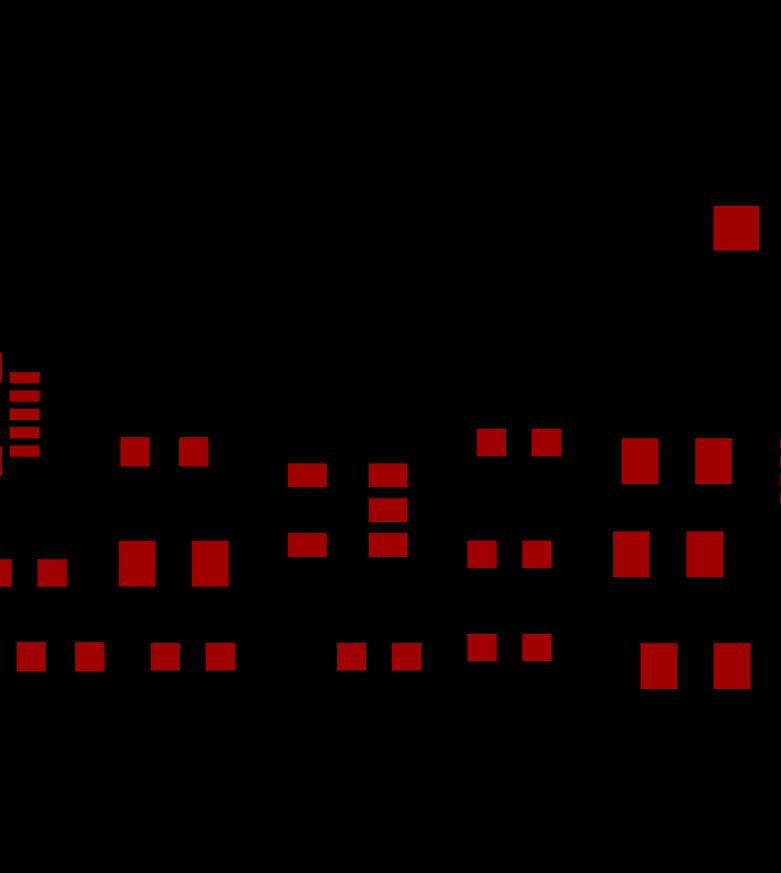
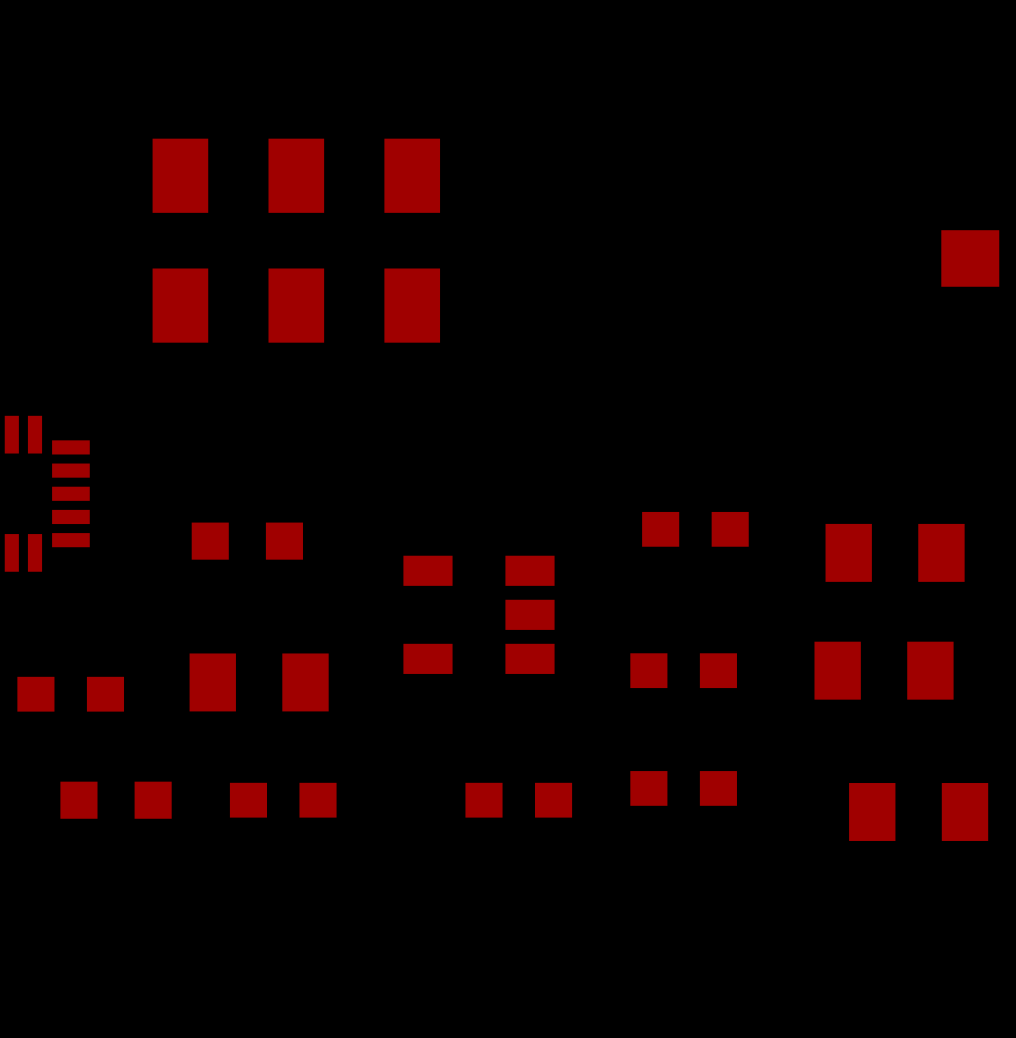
part: none -> (296, 240)

